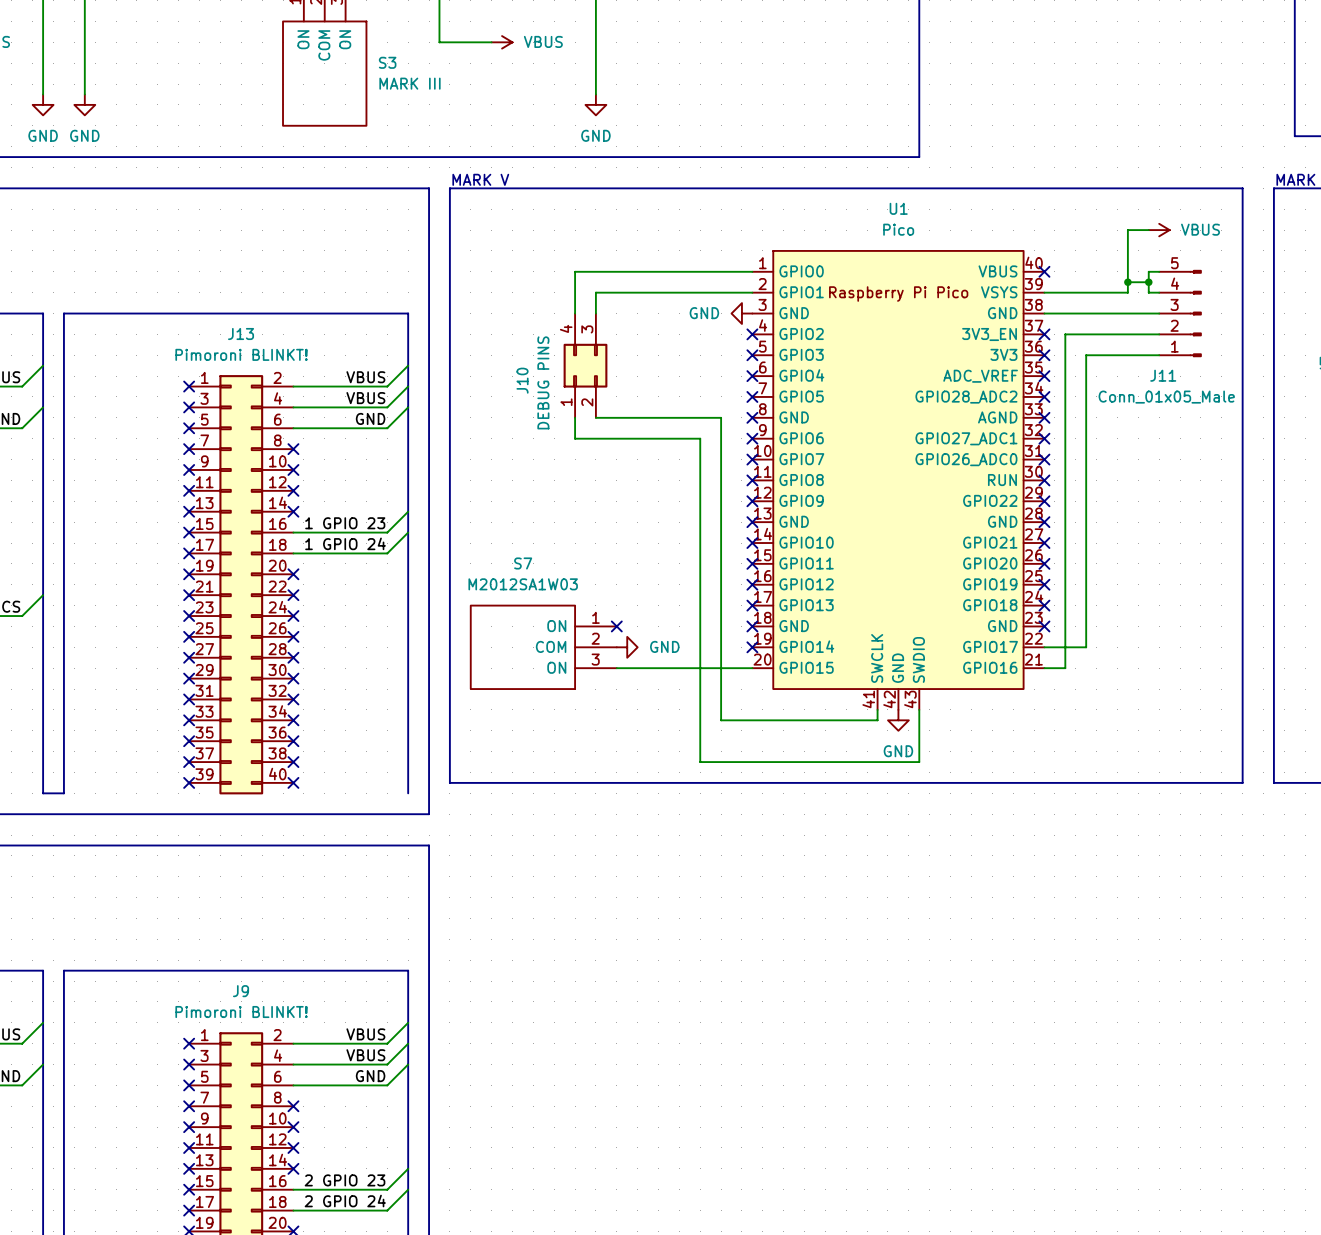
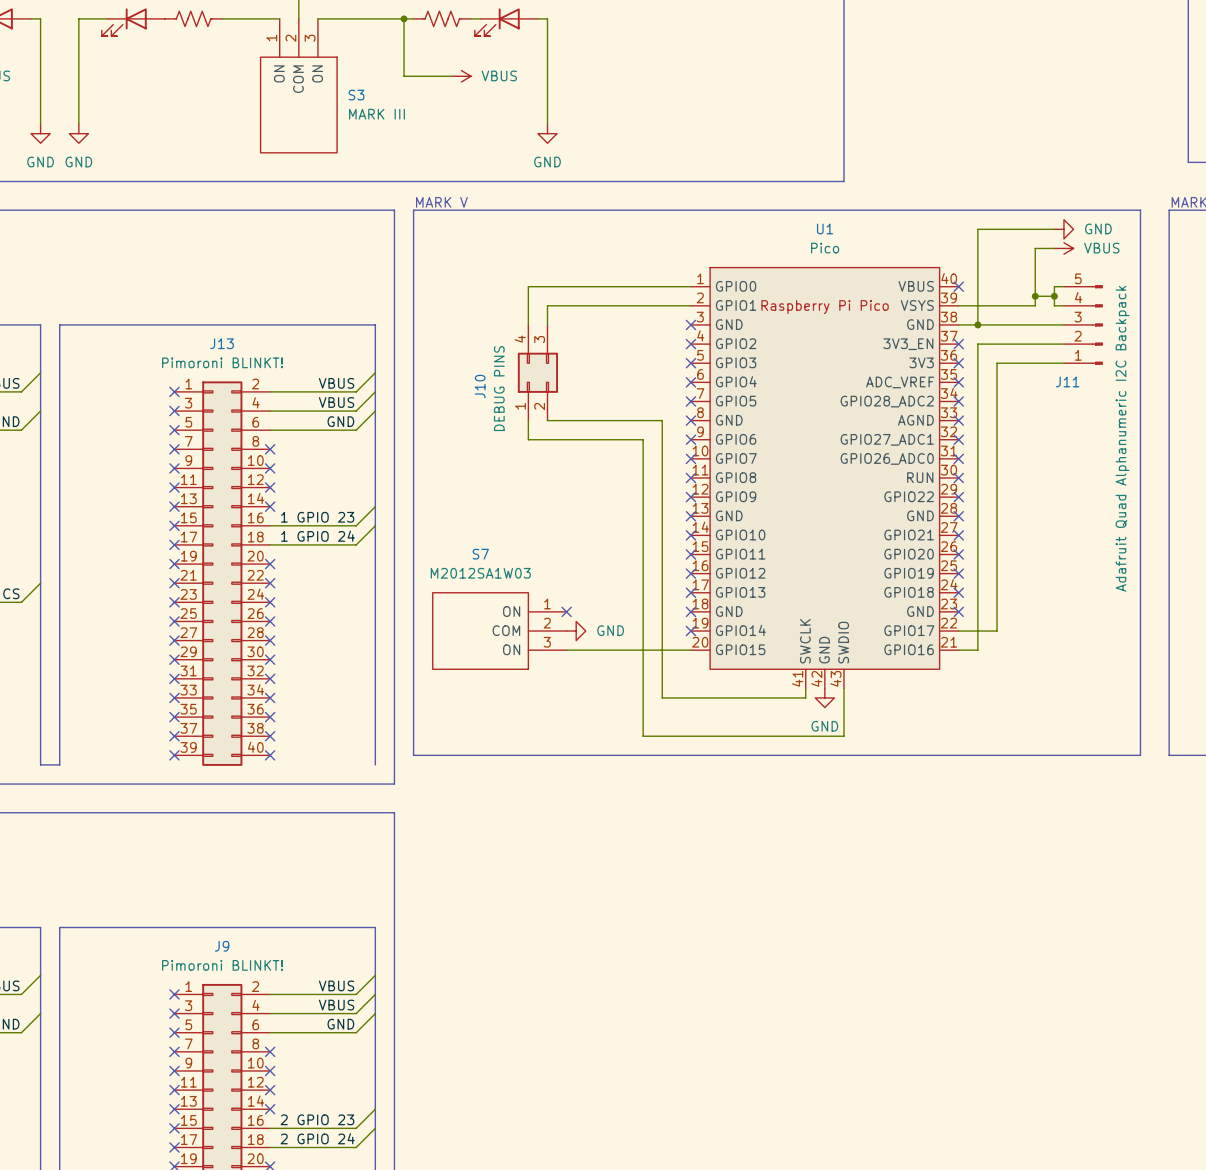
wire: none -> (1054, 229) (977, 229) (977, 324)
power symbol: none -> GND (1063, 229)
power symbol: GND (741, 313) -> none
no-connect mark: none -> (690, 324)
junction: none -> (977, 324)
J11 value: Conn_01x05_Male (1166, 397) -> Adafruit Quad Alphanumeric I2C Backpack (1122, 438)

